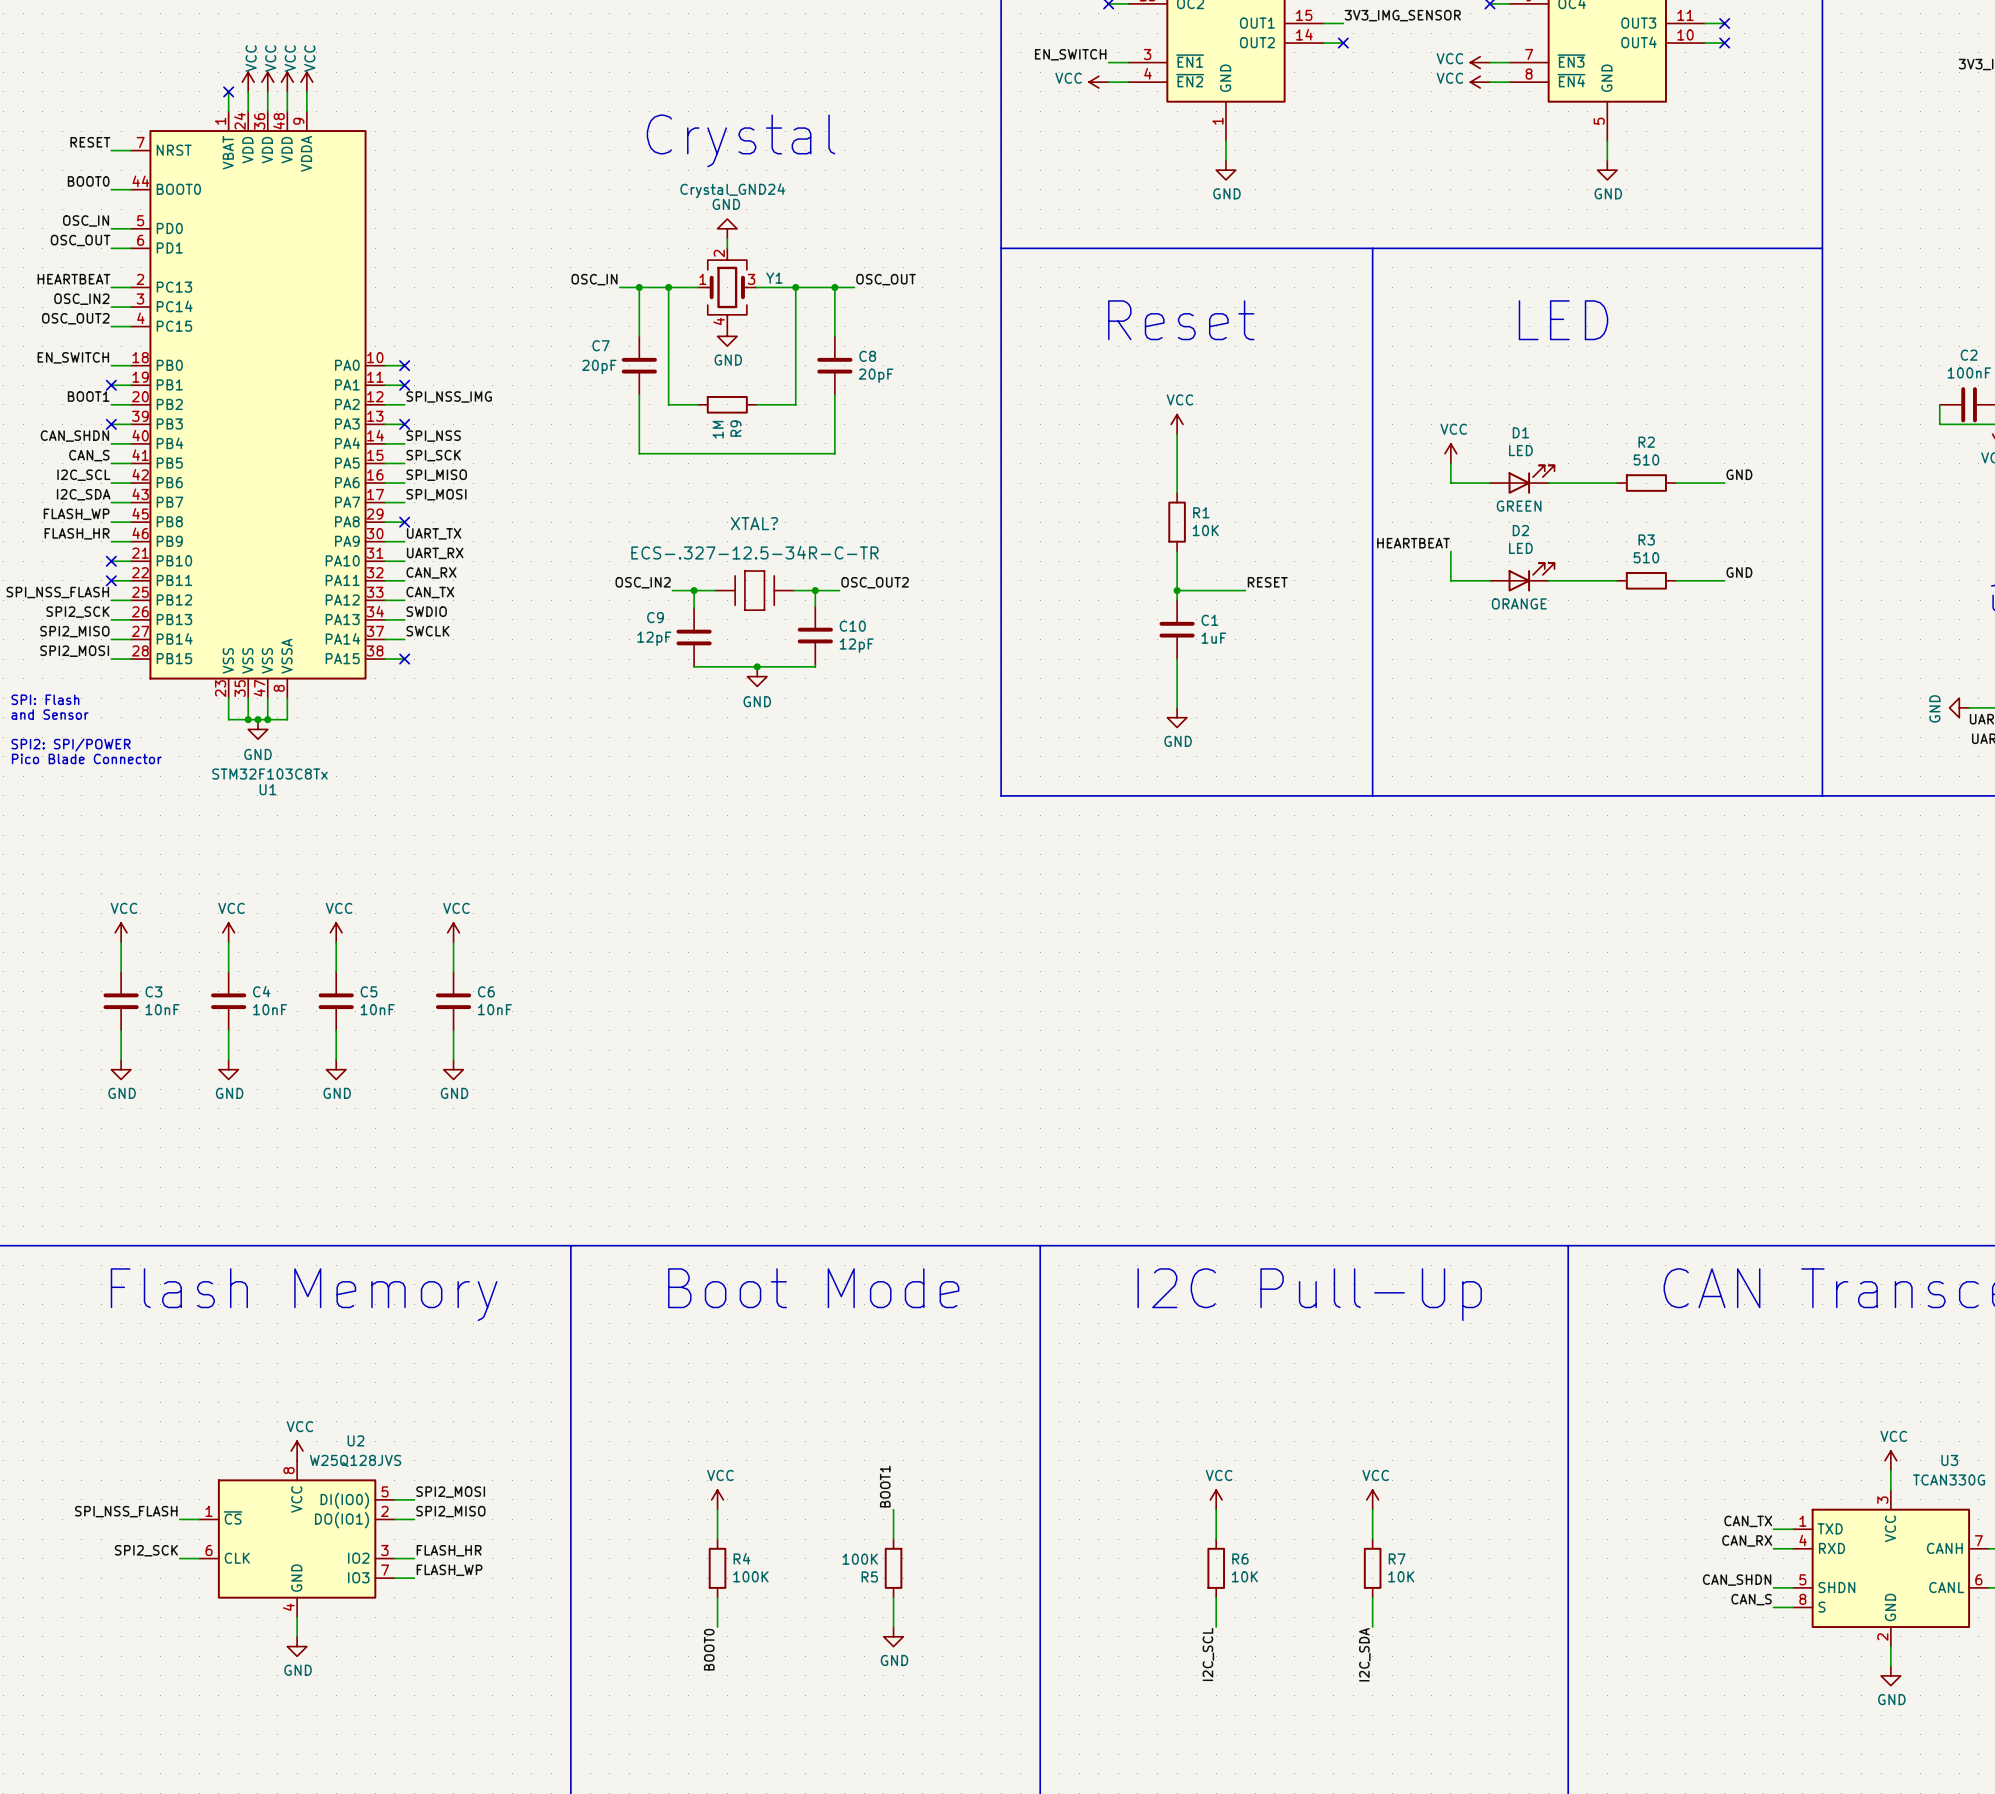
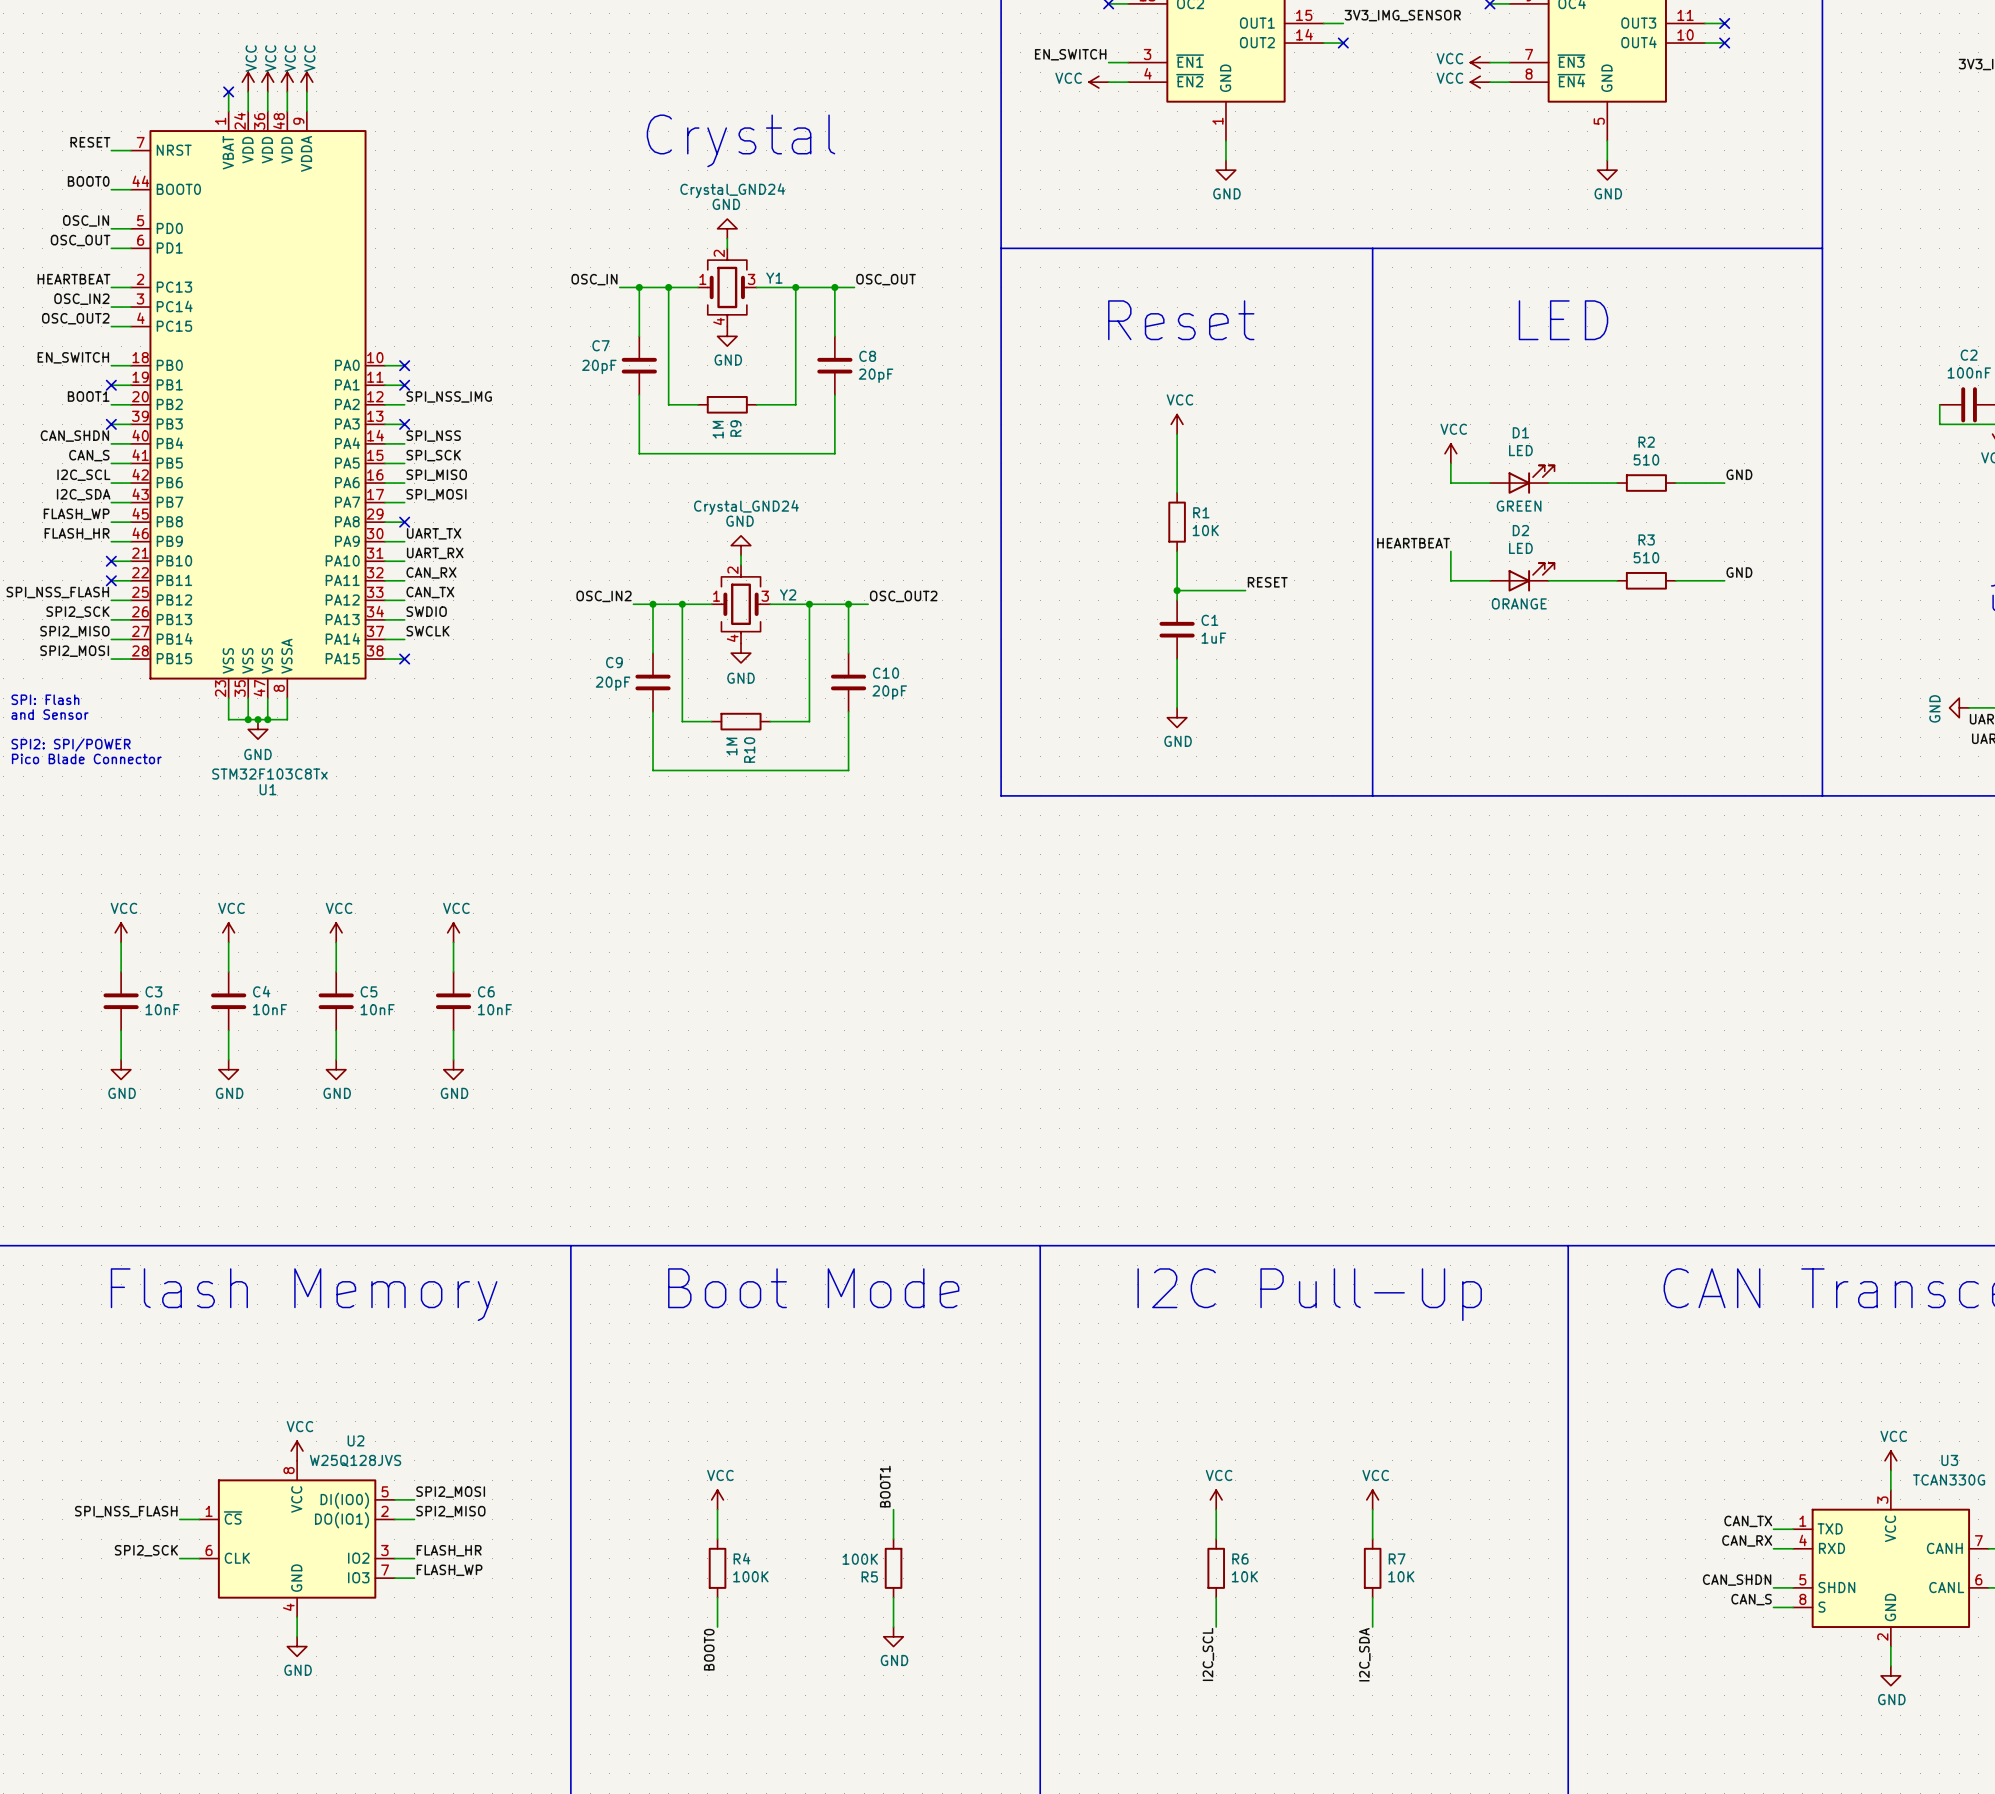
power symbol: none -> GND (741, 545)
wire: none -> (741, 555) (741, 565)
label position: OSC_IN2 (643, 582) -> OSC_IN2 (604, 596)
label position: OSC_OUT2 (875, 582) -> OSC_OUT2 (903, 596)
wire: (672, 590) (715, 590) -> none
wire: (694, 590) (694, 608) -> none
junction position: (694, 590) -> (682, 604)
XTAL?: ECS-.327-12.5-34R-C-TR (754, 590) -> none
wire: (793, 590) (839, 590) -> none
wire: (815, 590) (815, 606) -> none
junction position: (815, 590) -> (809, 604)
wire: none -> (633, 604) (711, 604)
wire: none -> (653, 604) (653, 653)
junction: none -> (653, 604)
wire: none -> (682, 604) (682, 721) (711, 721)
Y2: none -> Crystal_GND24 (741, 604)
wire: none -> (770, 604) (868, 604)
wire: none -> (809, 604) (809, 721) (770, 721)
wire: none -> (848, 604) (848, 653)
junction: none -> (848, 604)
C10 position: (815, 635) -> (848, 682)
C9 position: (694, 637) -> (653, 682)
C9 value: 12pF (654, 638) -> 20pF (613, 683)
C10 value: 12pF (856, 645) -> 20pF (889, 692)
wire: (815, 664) (815, 666) (694, 666) -> none
junction: (757, 666) -> none
power symbol position: GND (757, 676) -> GND (741, 653)
wire: none -> (653, 711) (653, 770) (848, 770) (848, 711)
R10: none -> 1M (741, 721)

